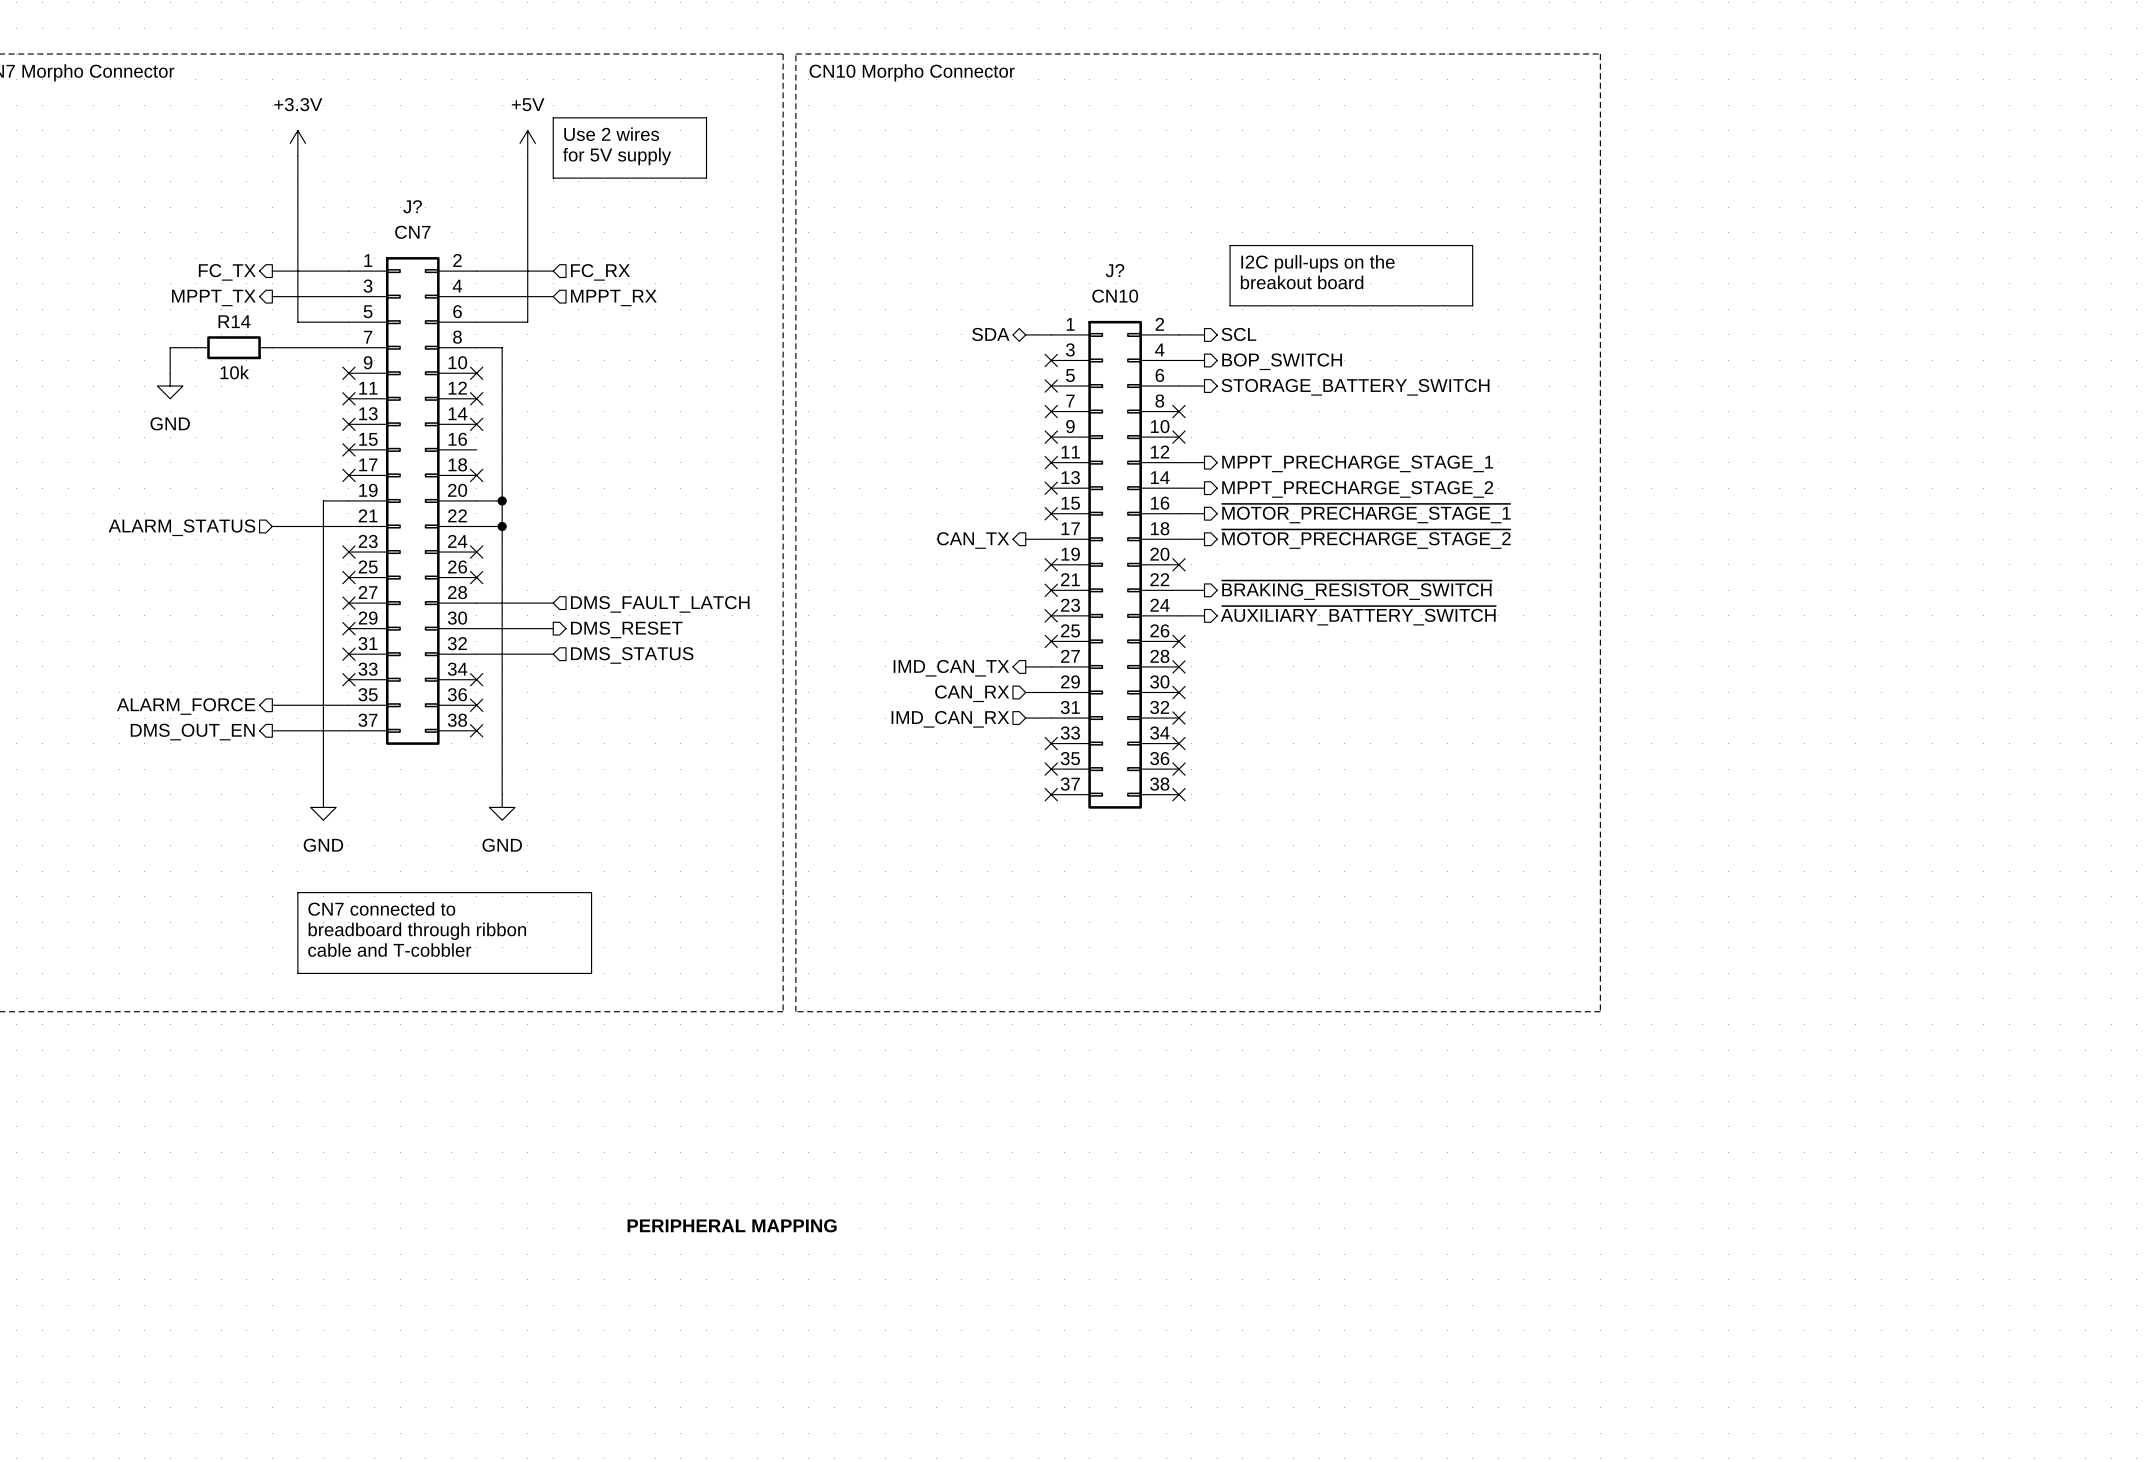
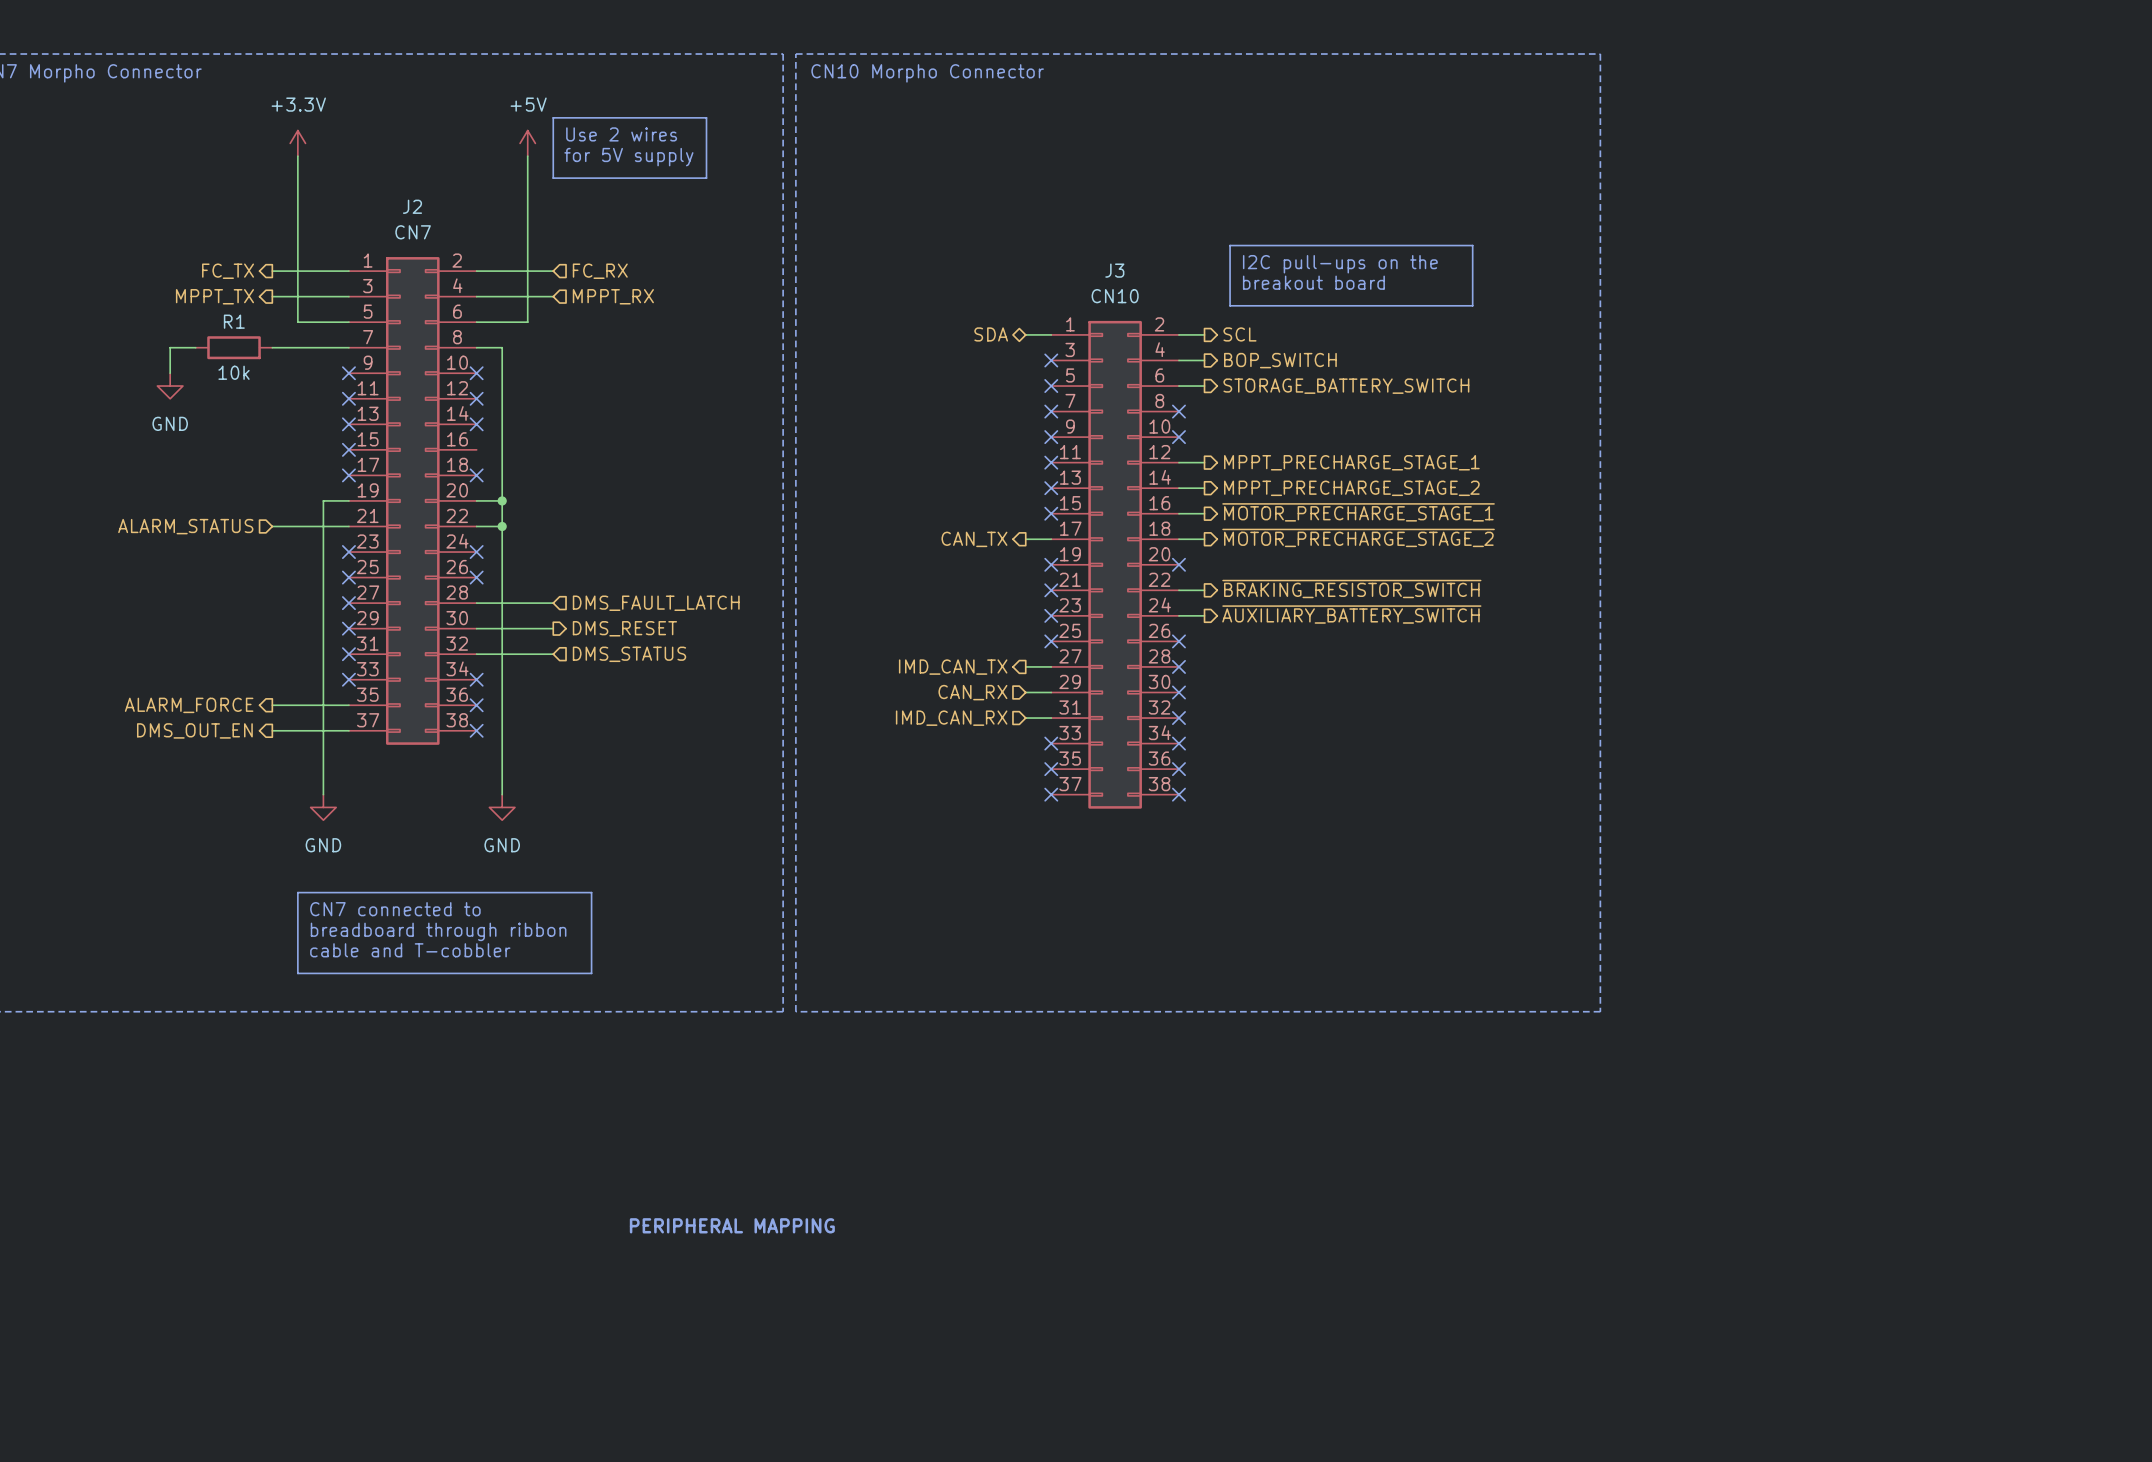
J? name: J? (412, 206) -> J2 (412, 206)
J? name: J? (1114, 270) -> J3 (1114, 270)
R14 name: R14 (234, 321) -> R1 (234, 321)

